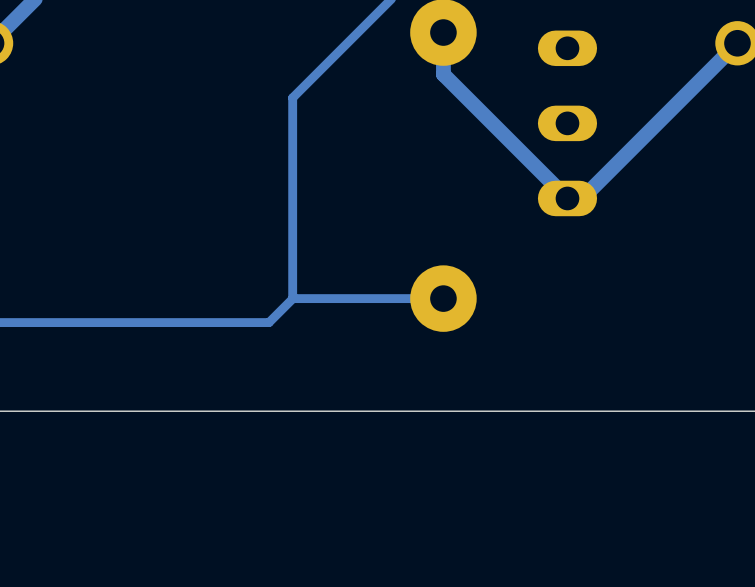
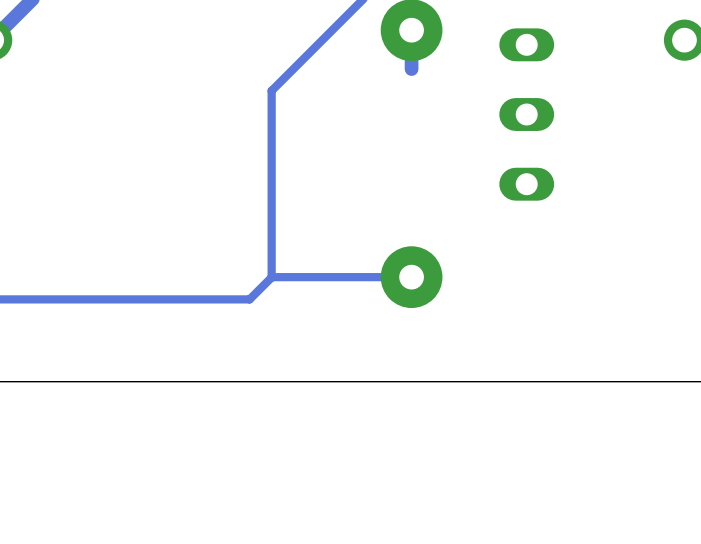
track: (737, 43) (582, 198) -> none
track: (443, 74) (567, 198) -> none

